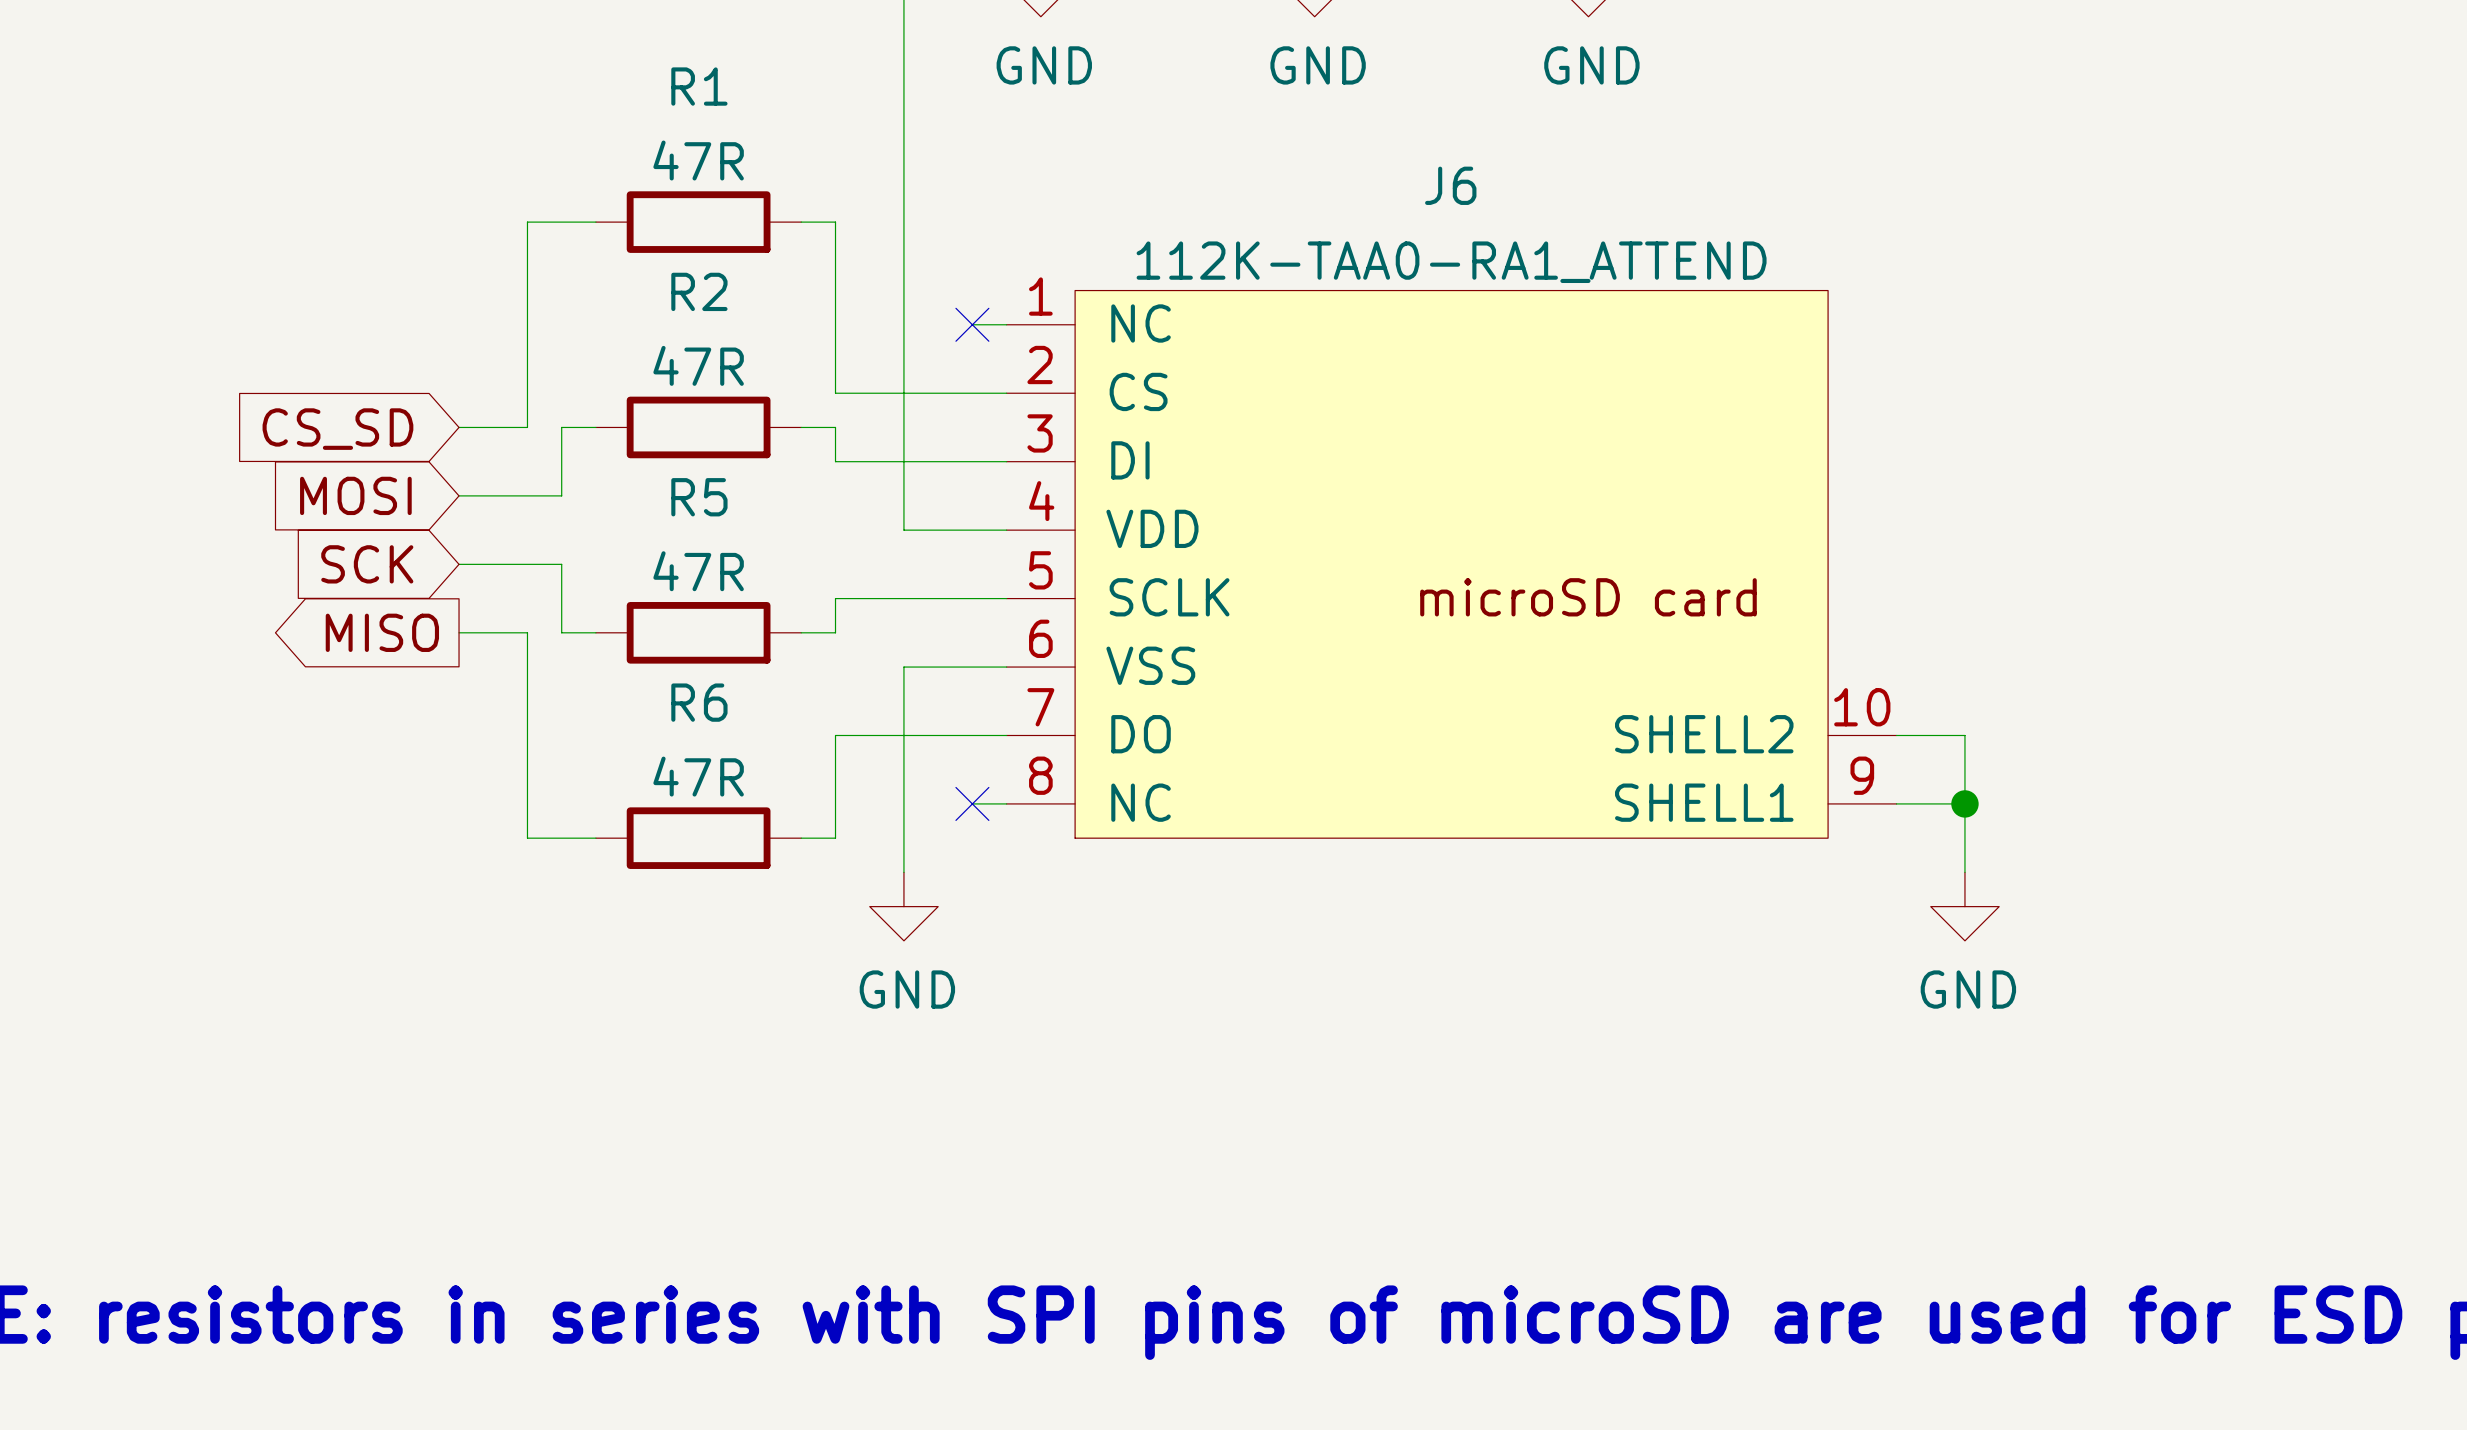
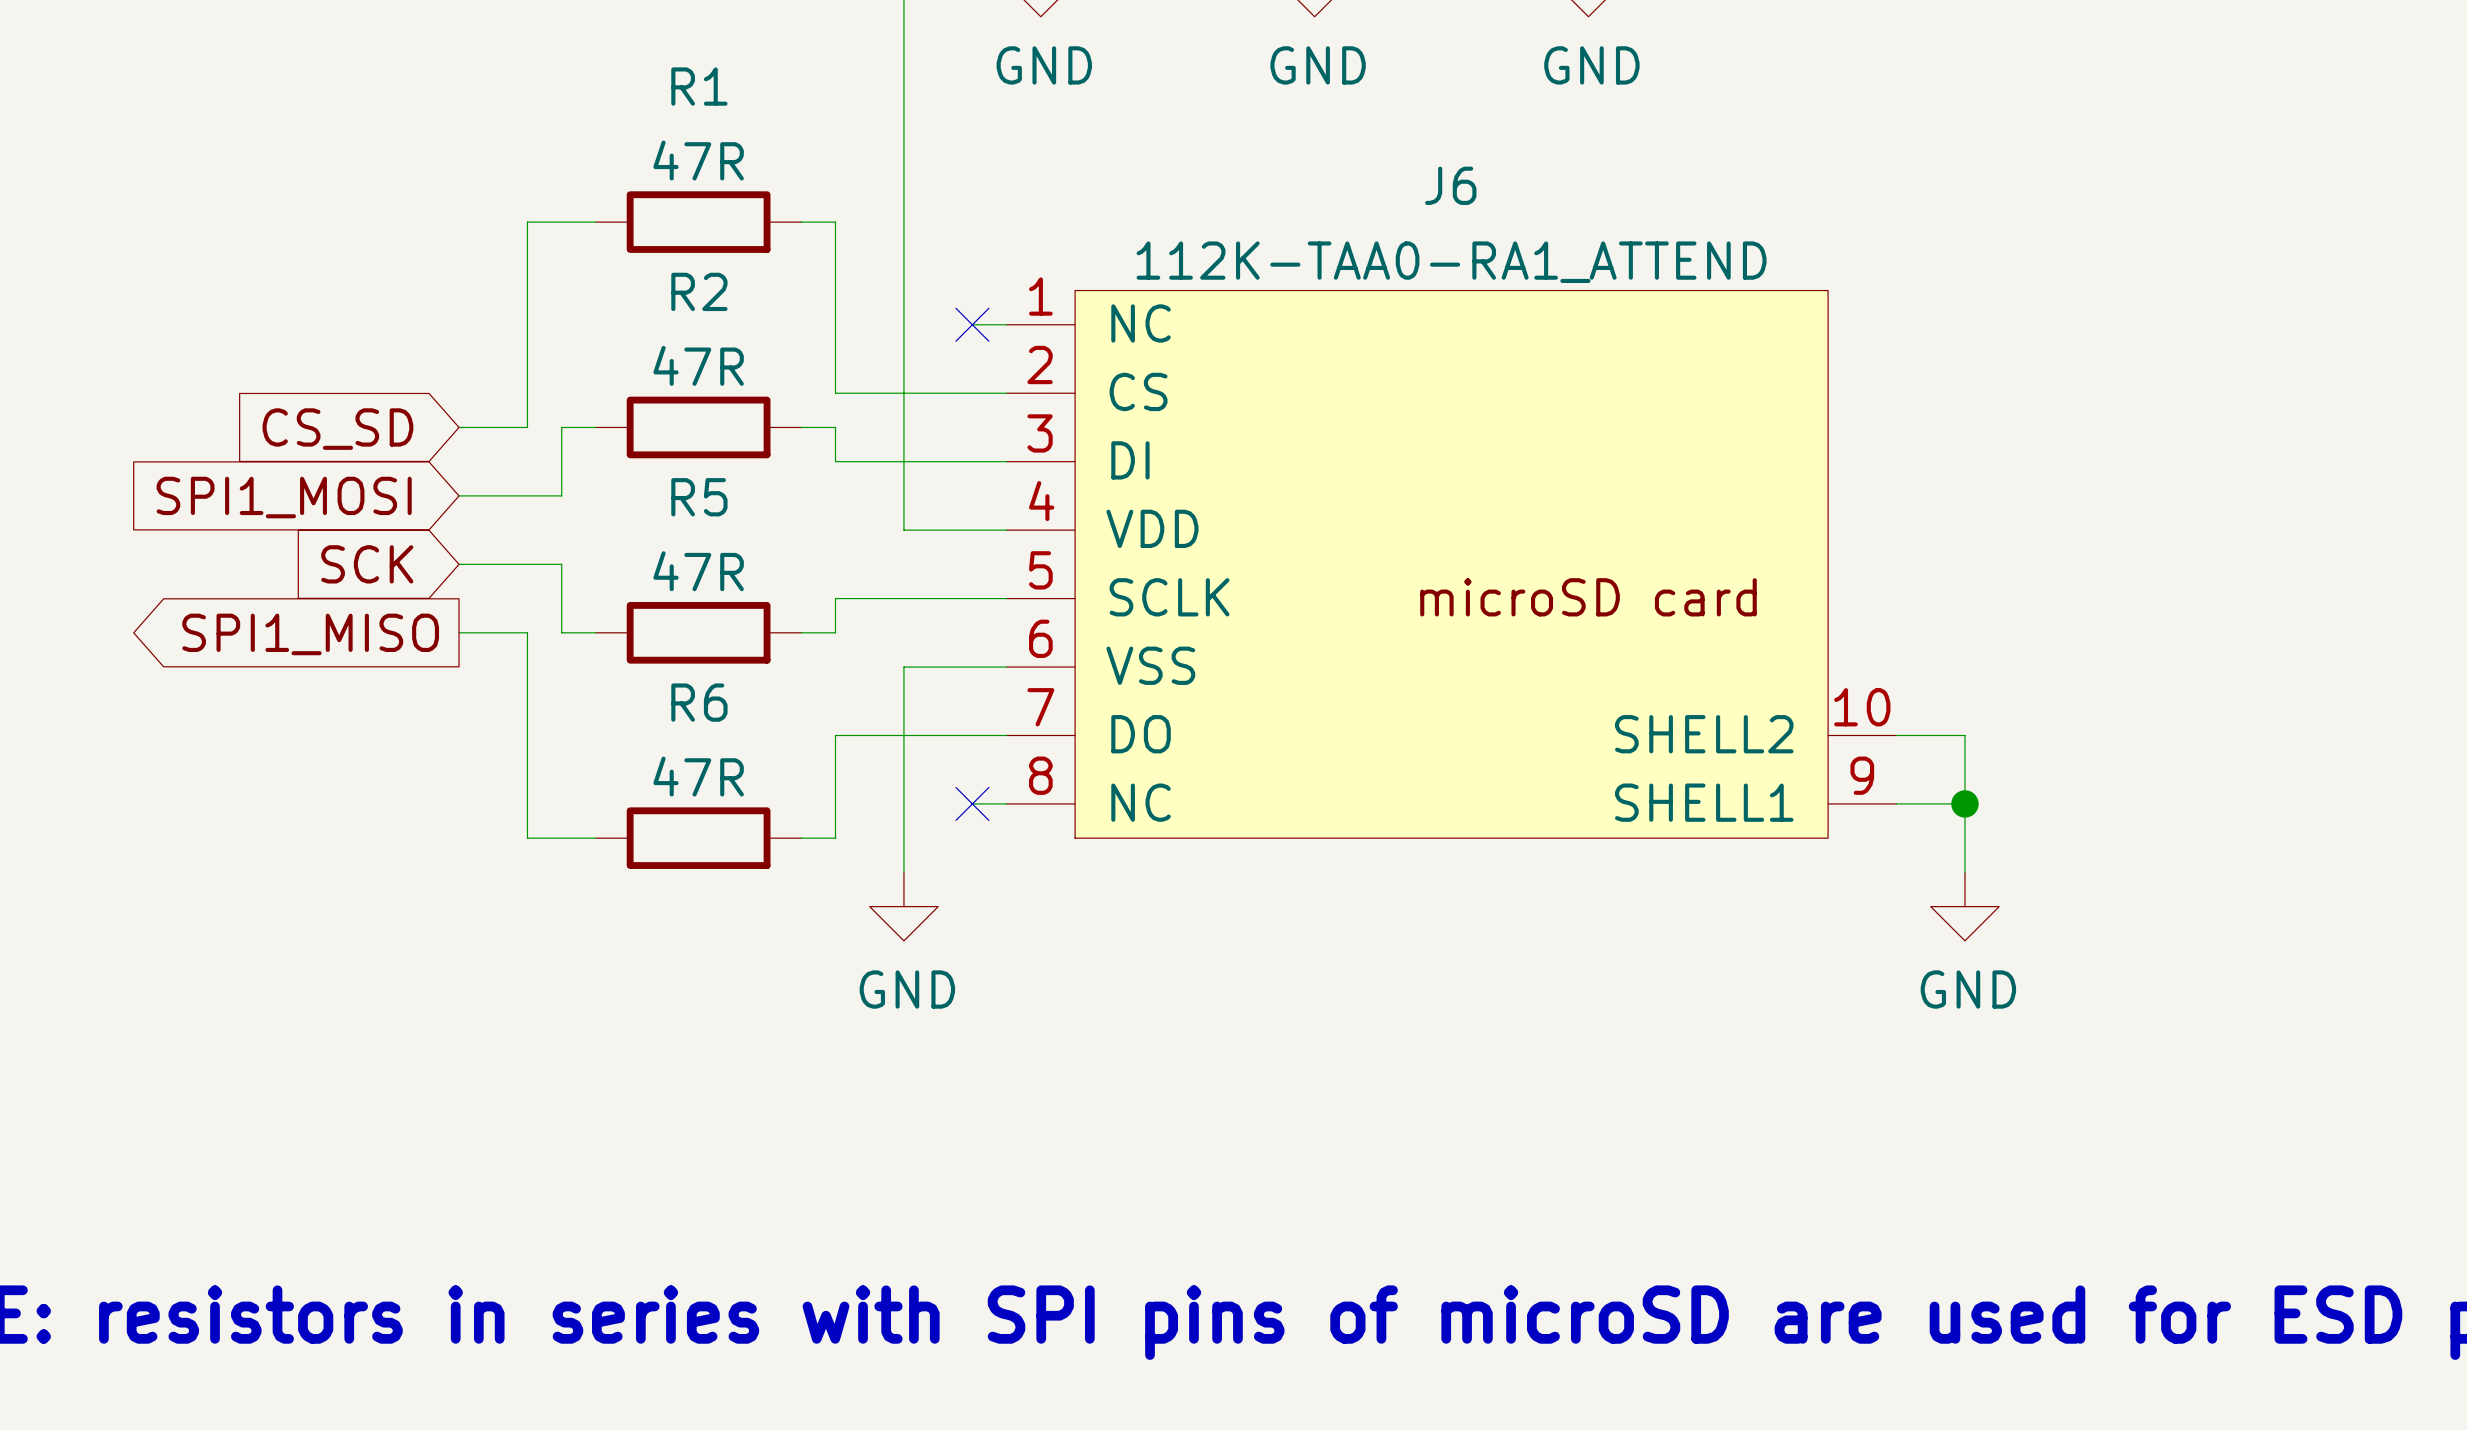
global label: MOSI (355, 495) -> SPI1_MOSI (284, 497)
global label: MISO (382, 632) -> SPI1_MISO (310, 634)

